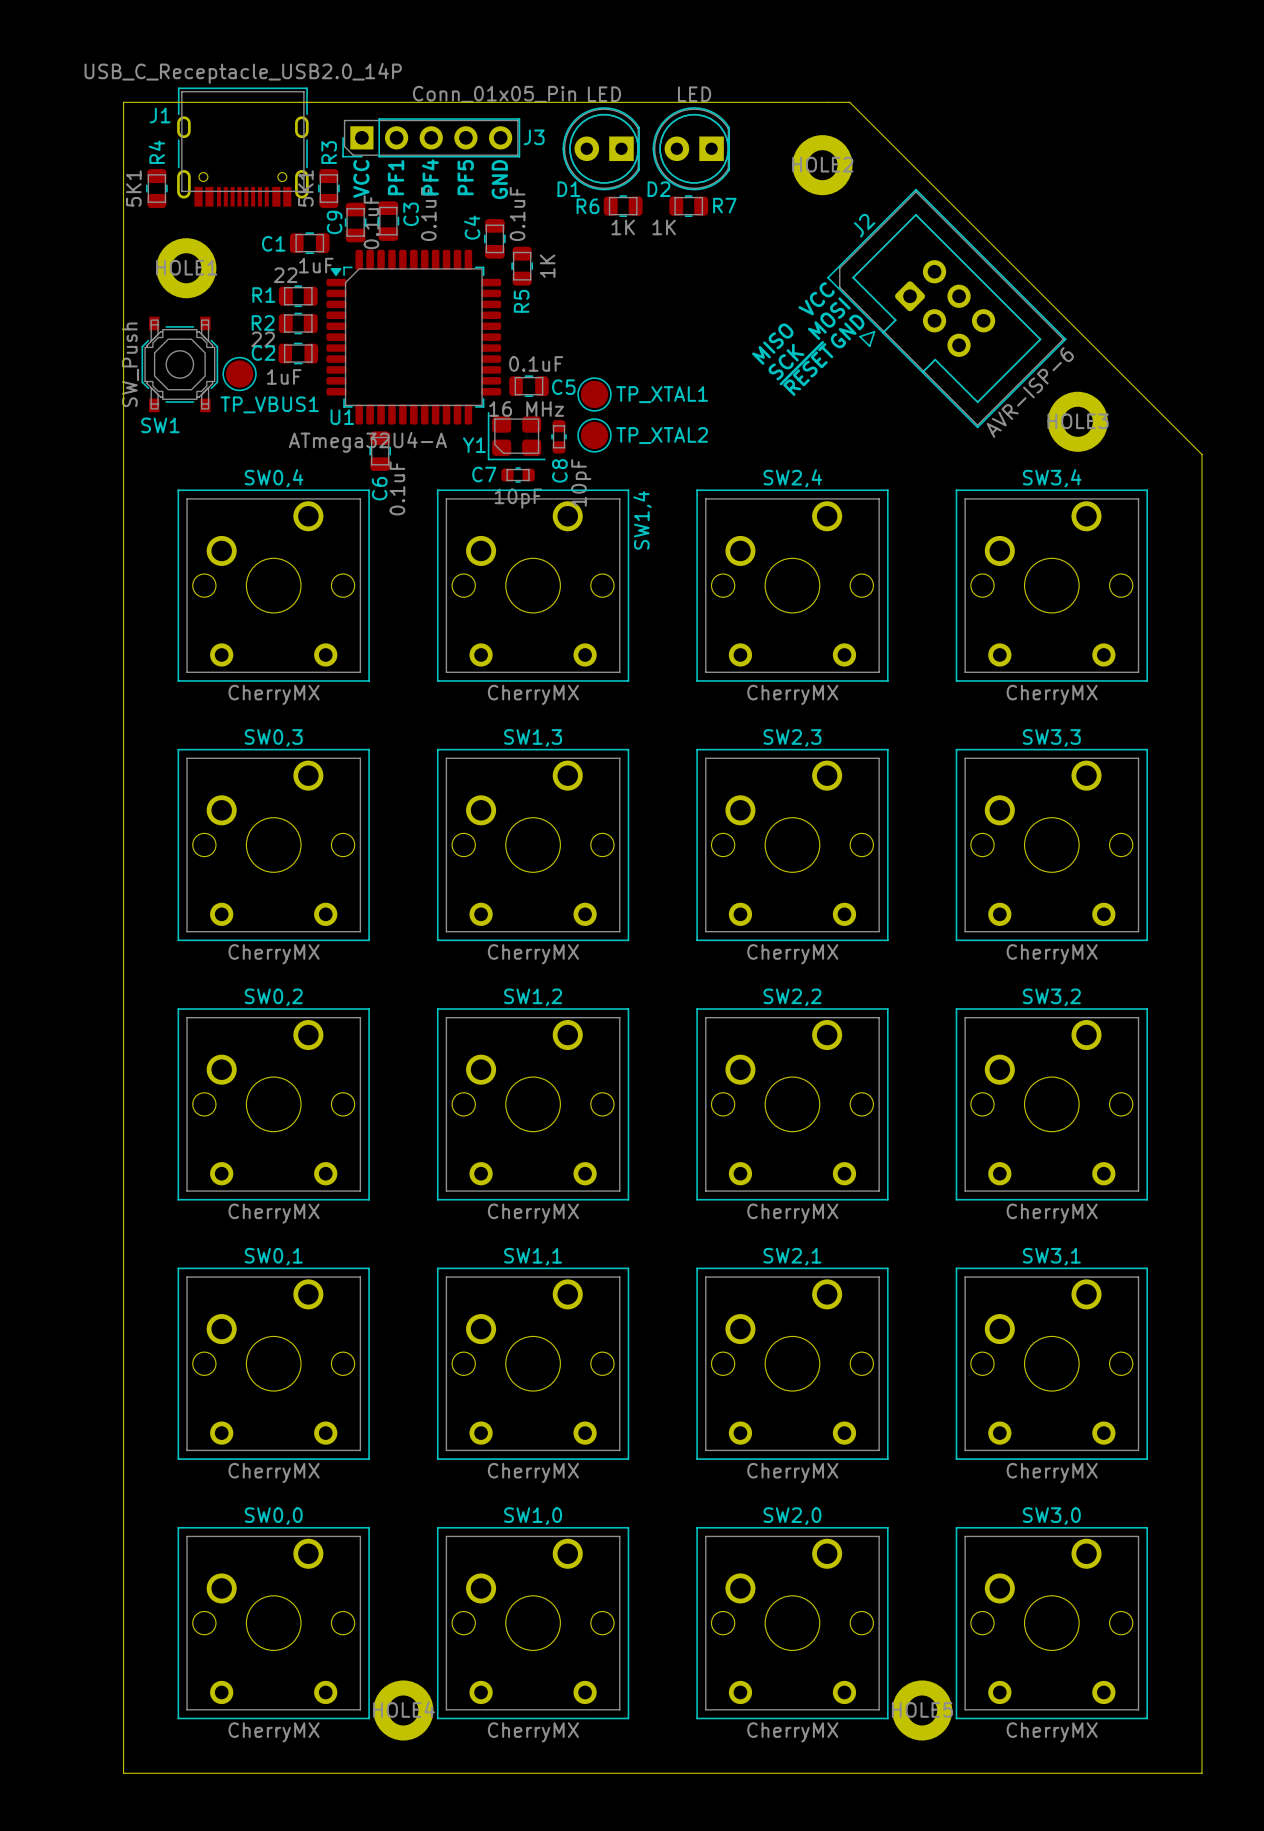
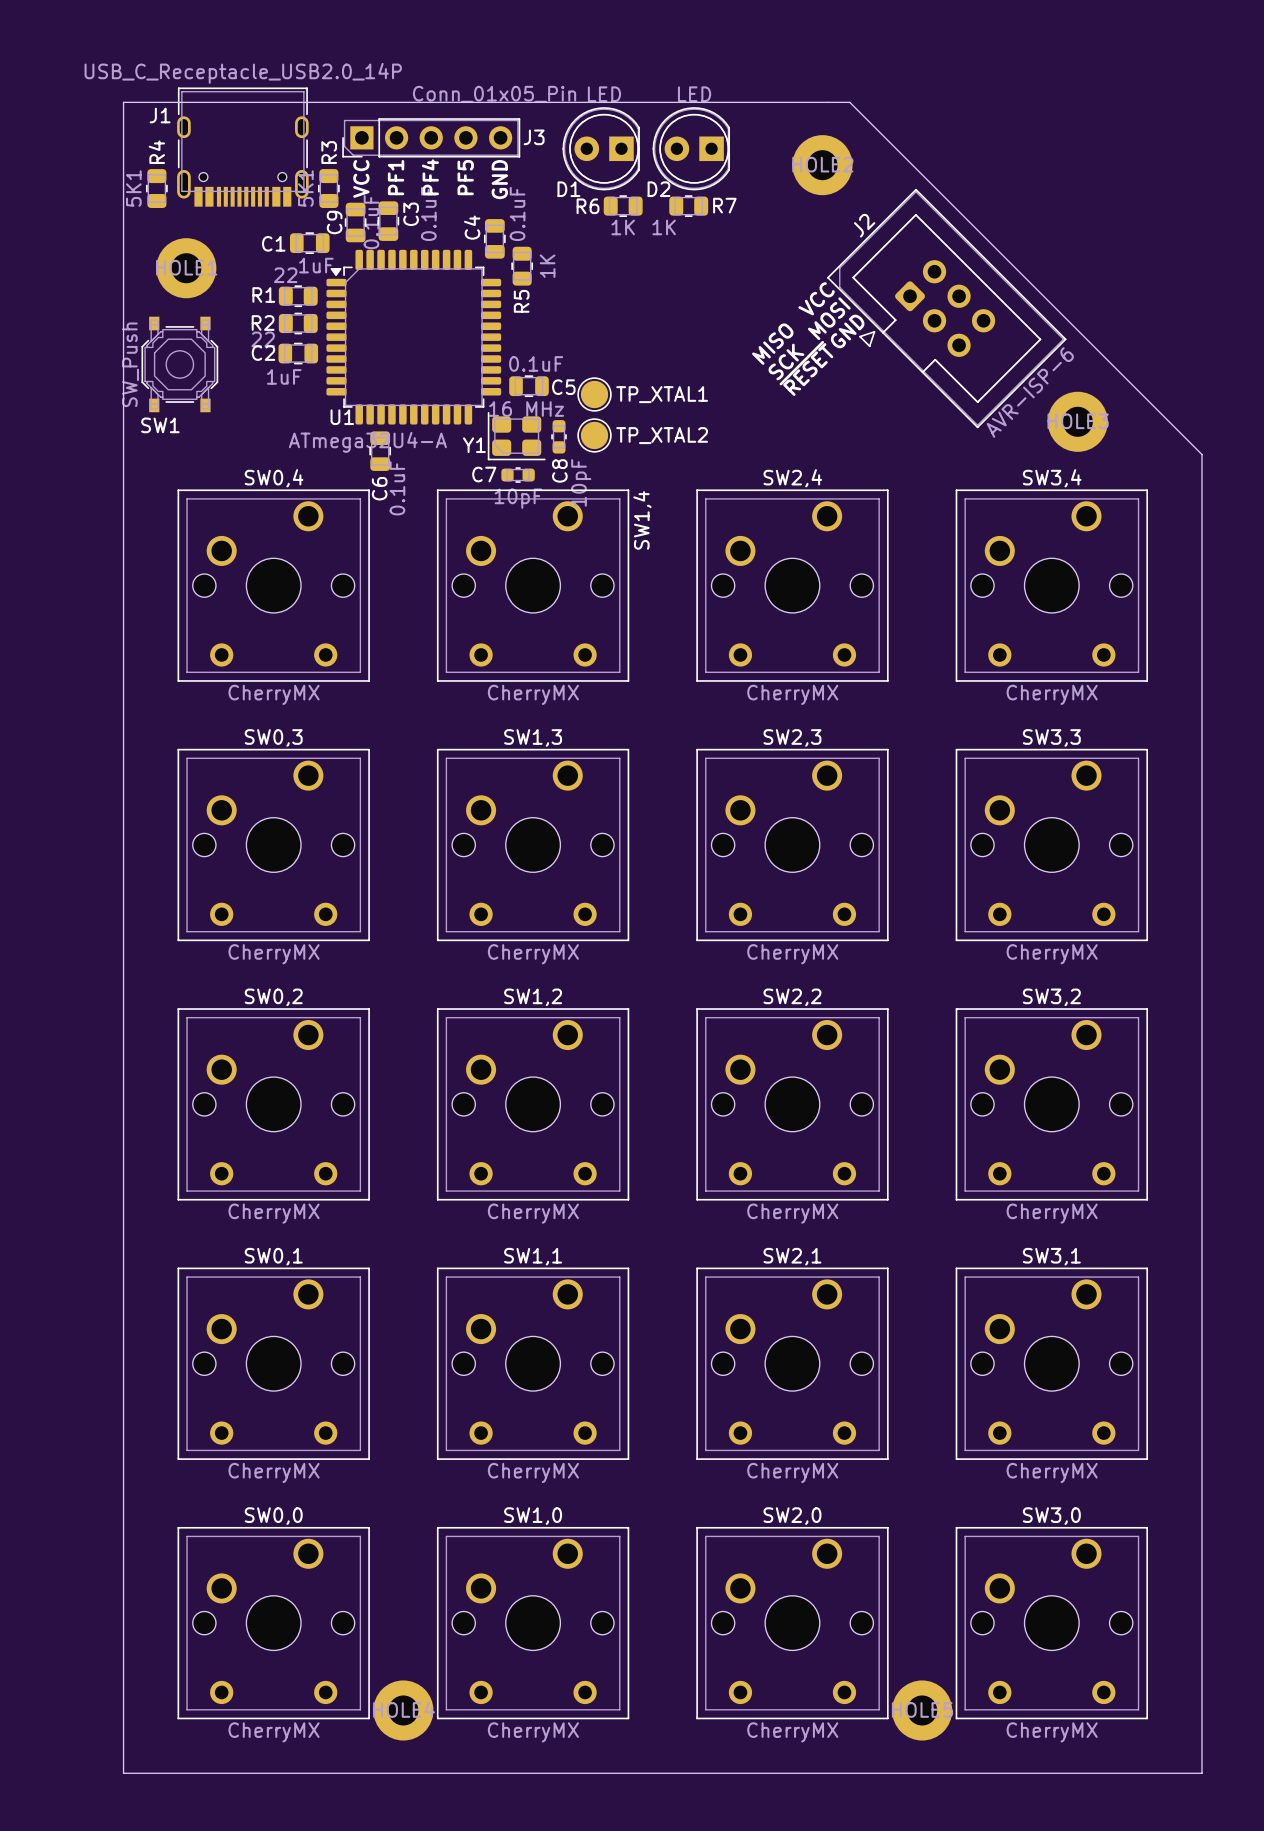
TP_VBUS1: (239, 374) -> none

